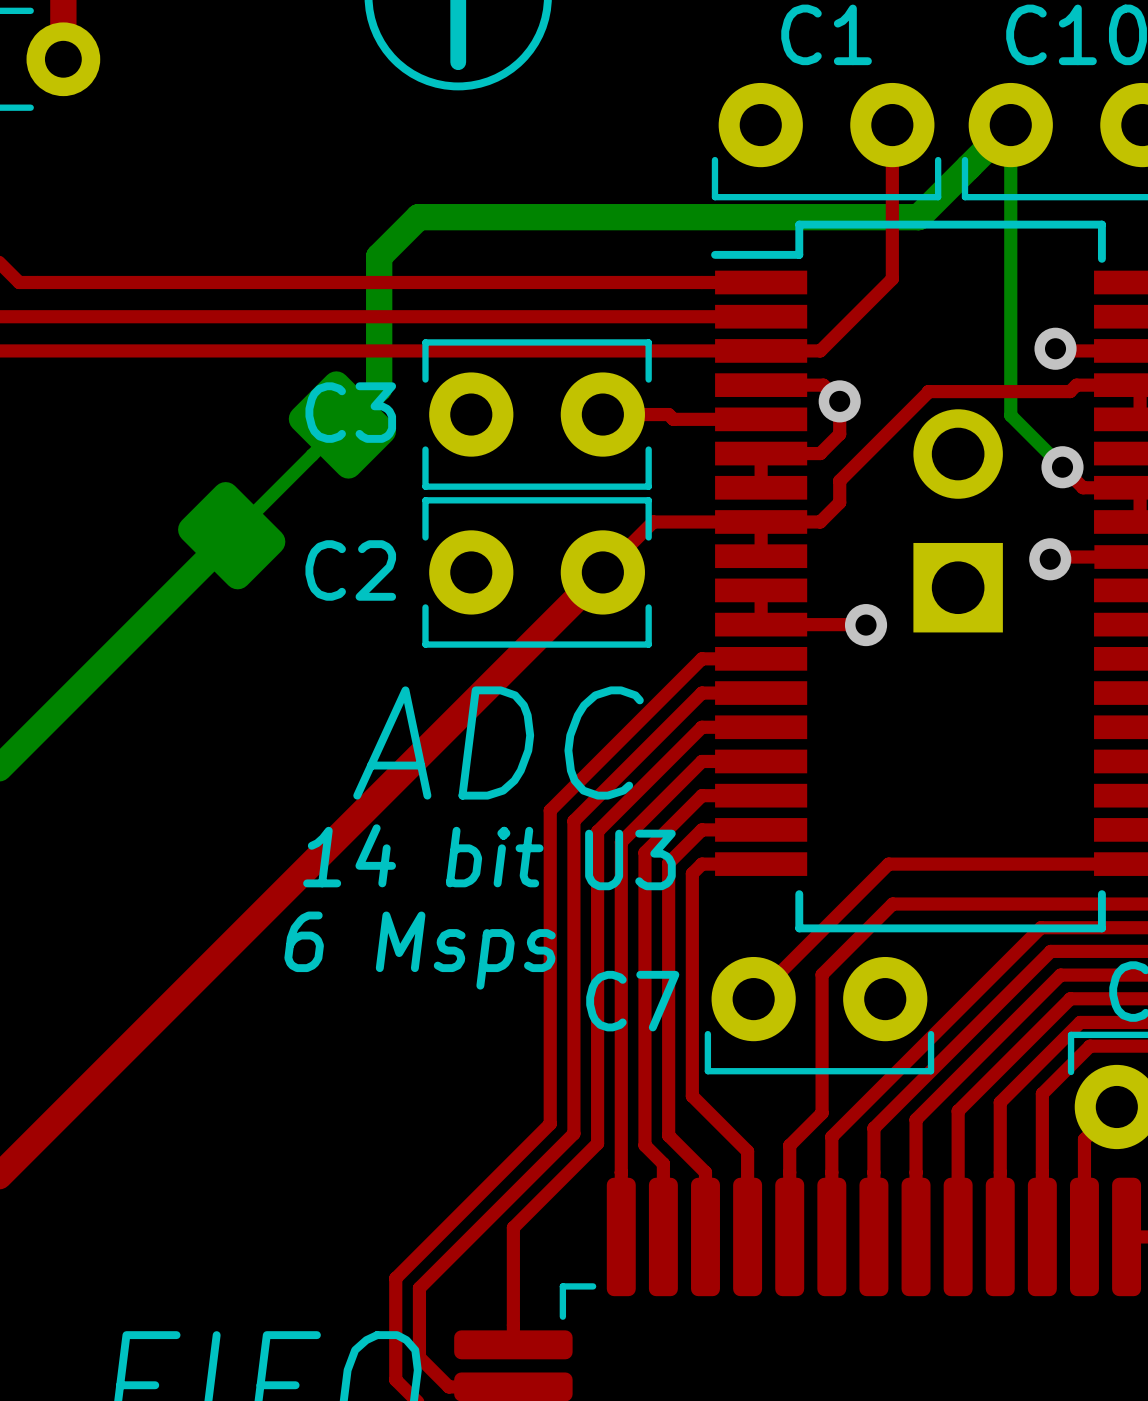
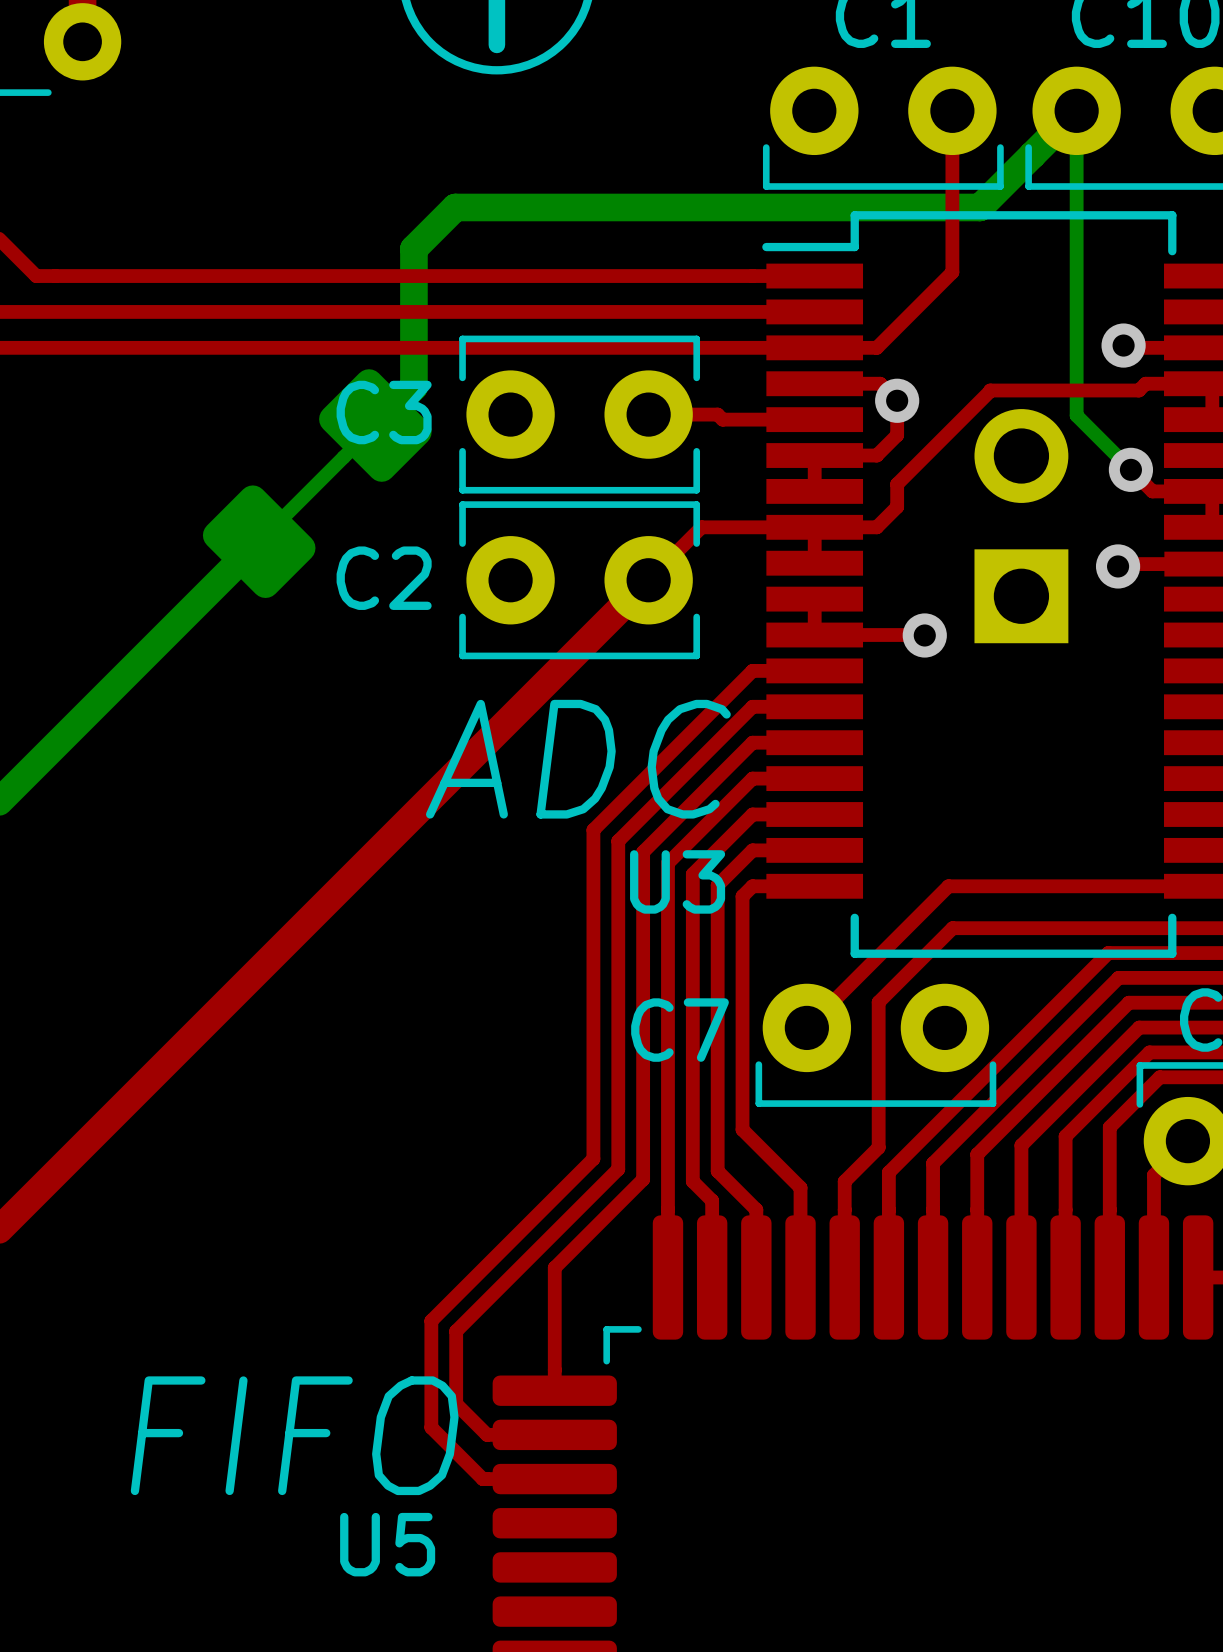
text position: ADC (498, 742) -> ADC (578, 759)
text: 14 bit (423, 855) -> none
text: 6 Msps (420, 950) -> none

